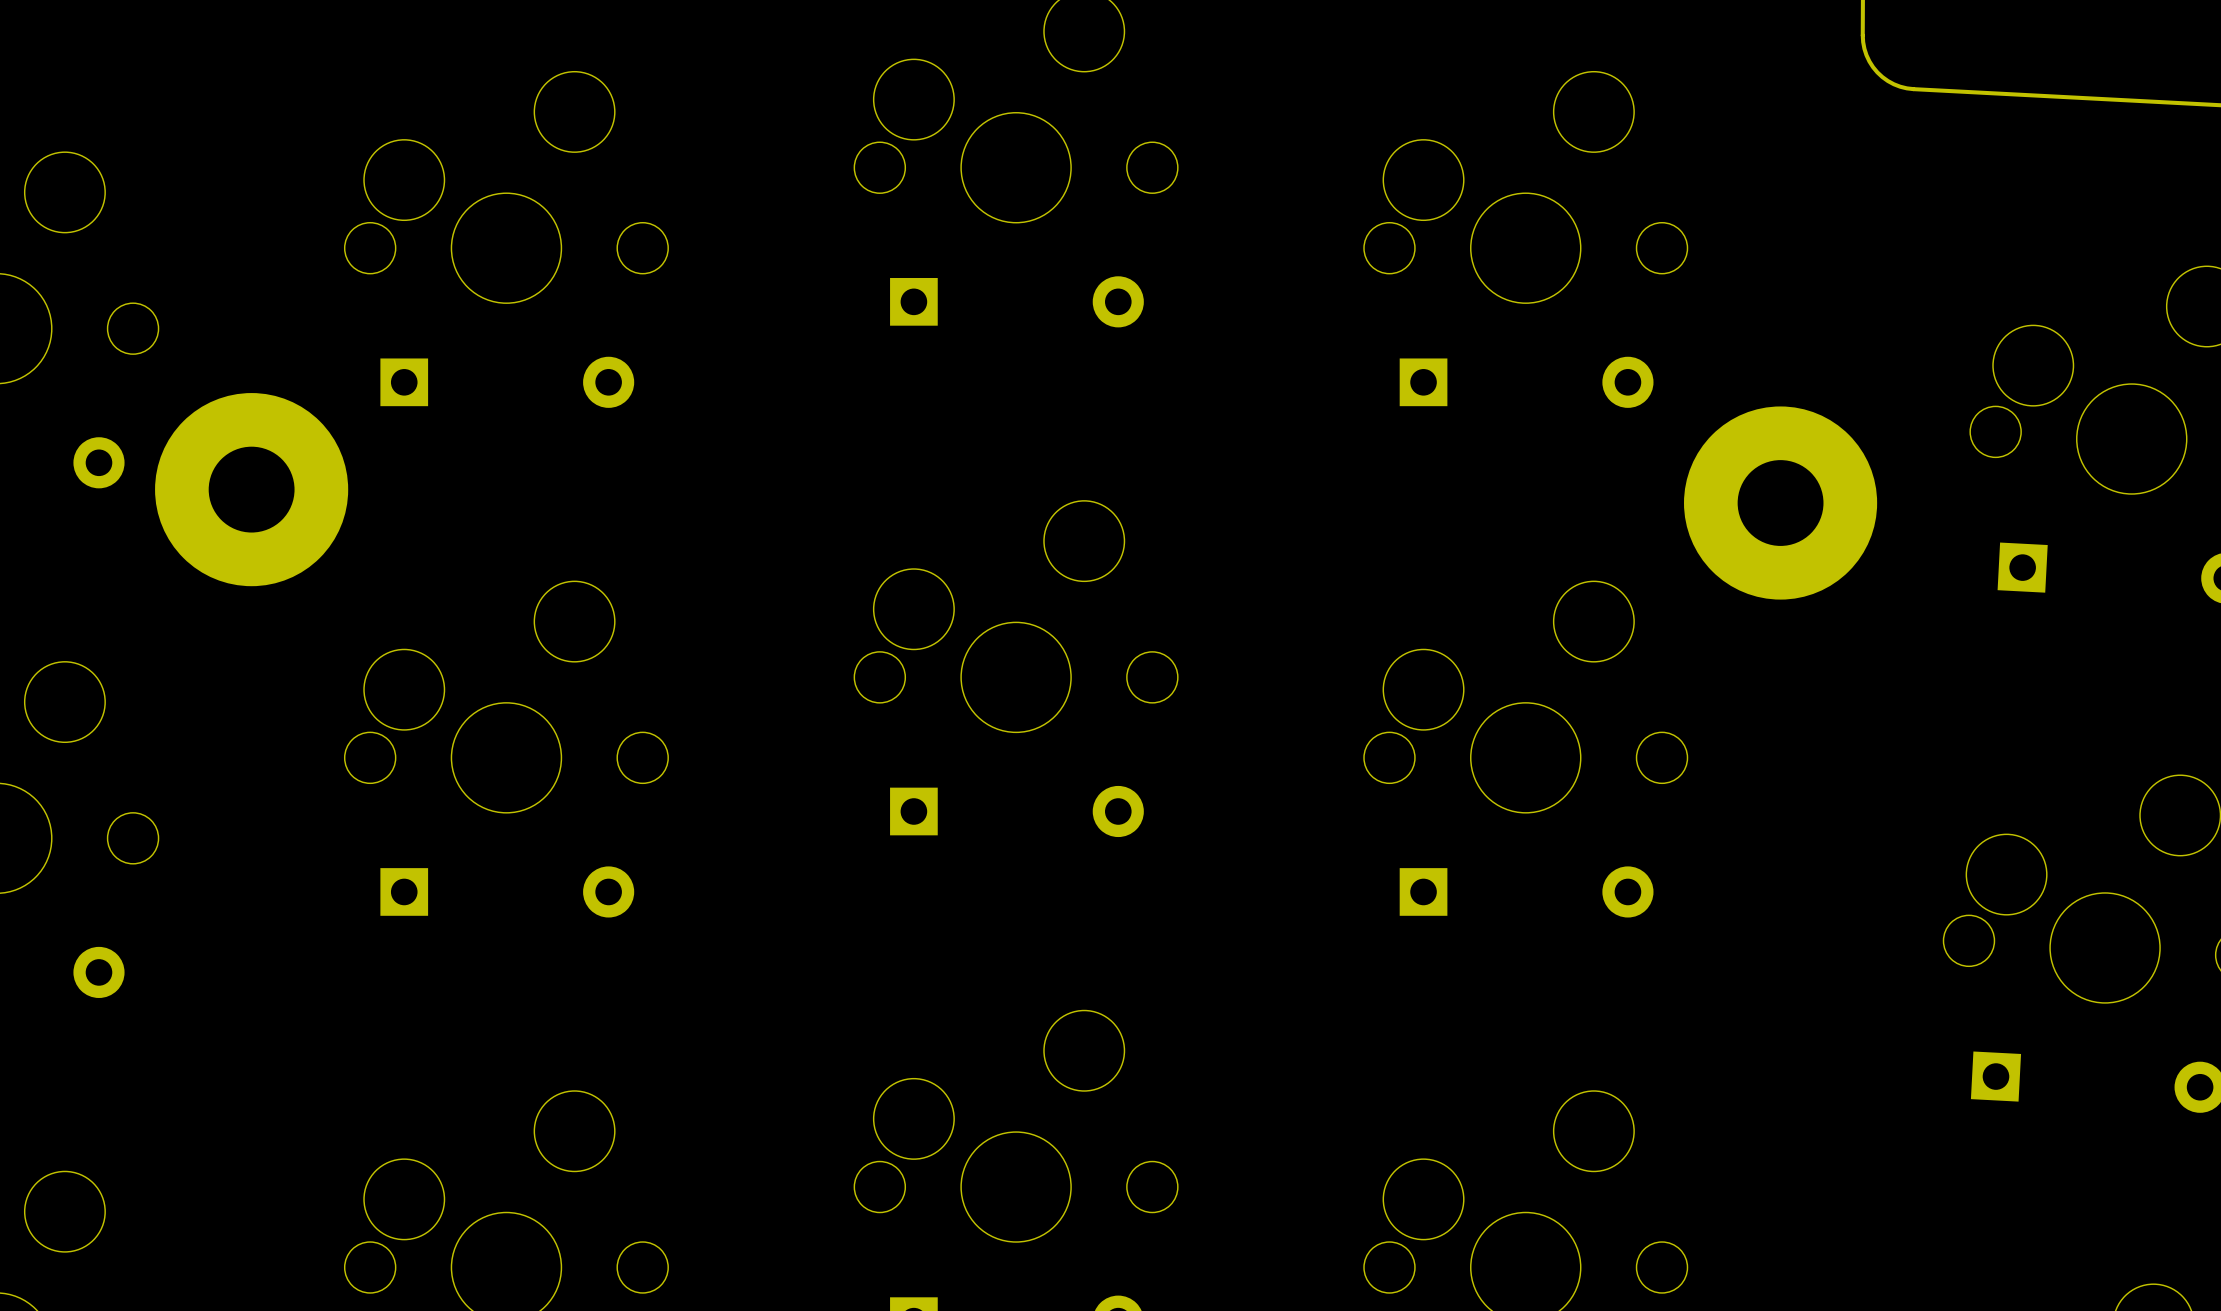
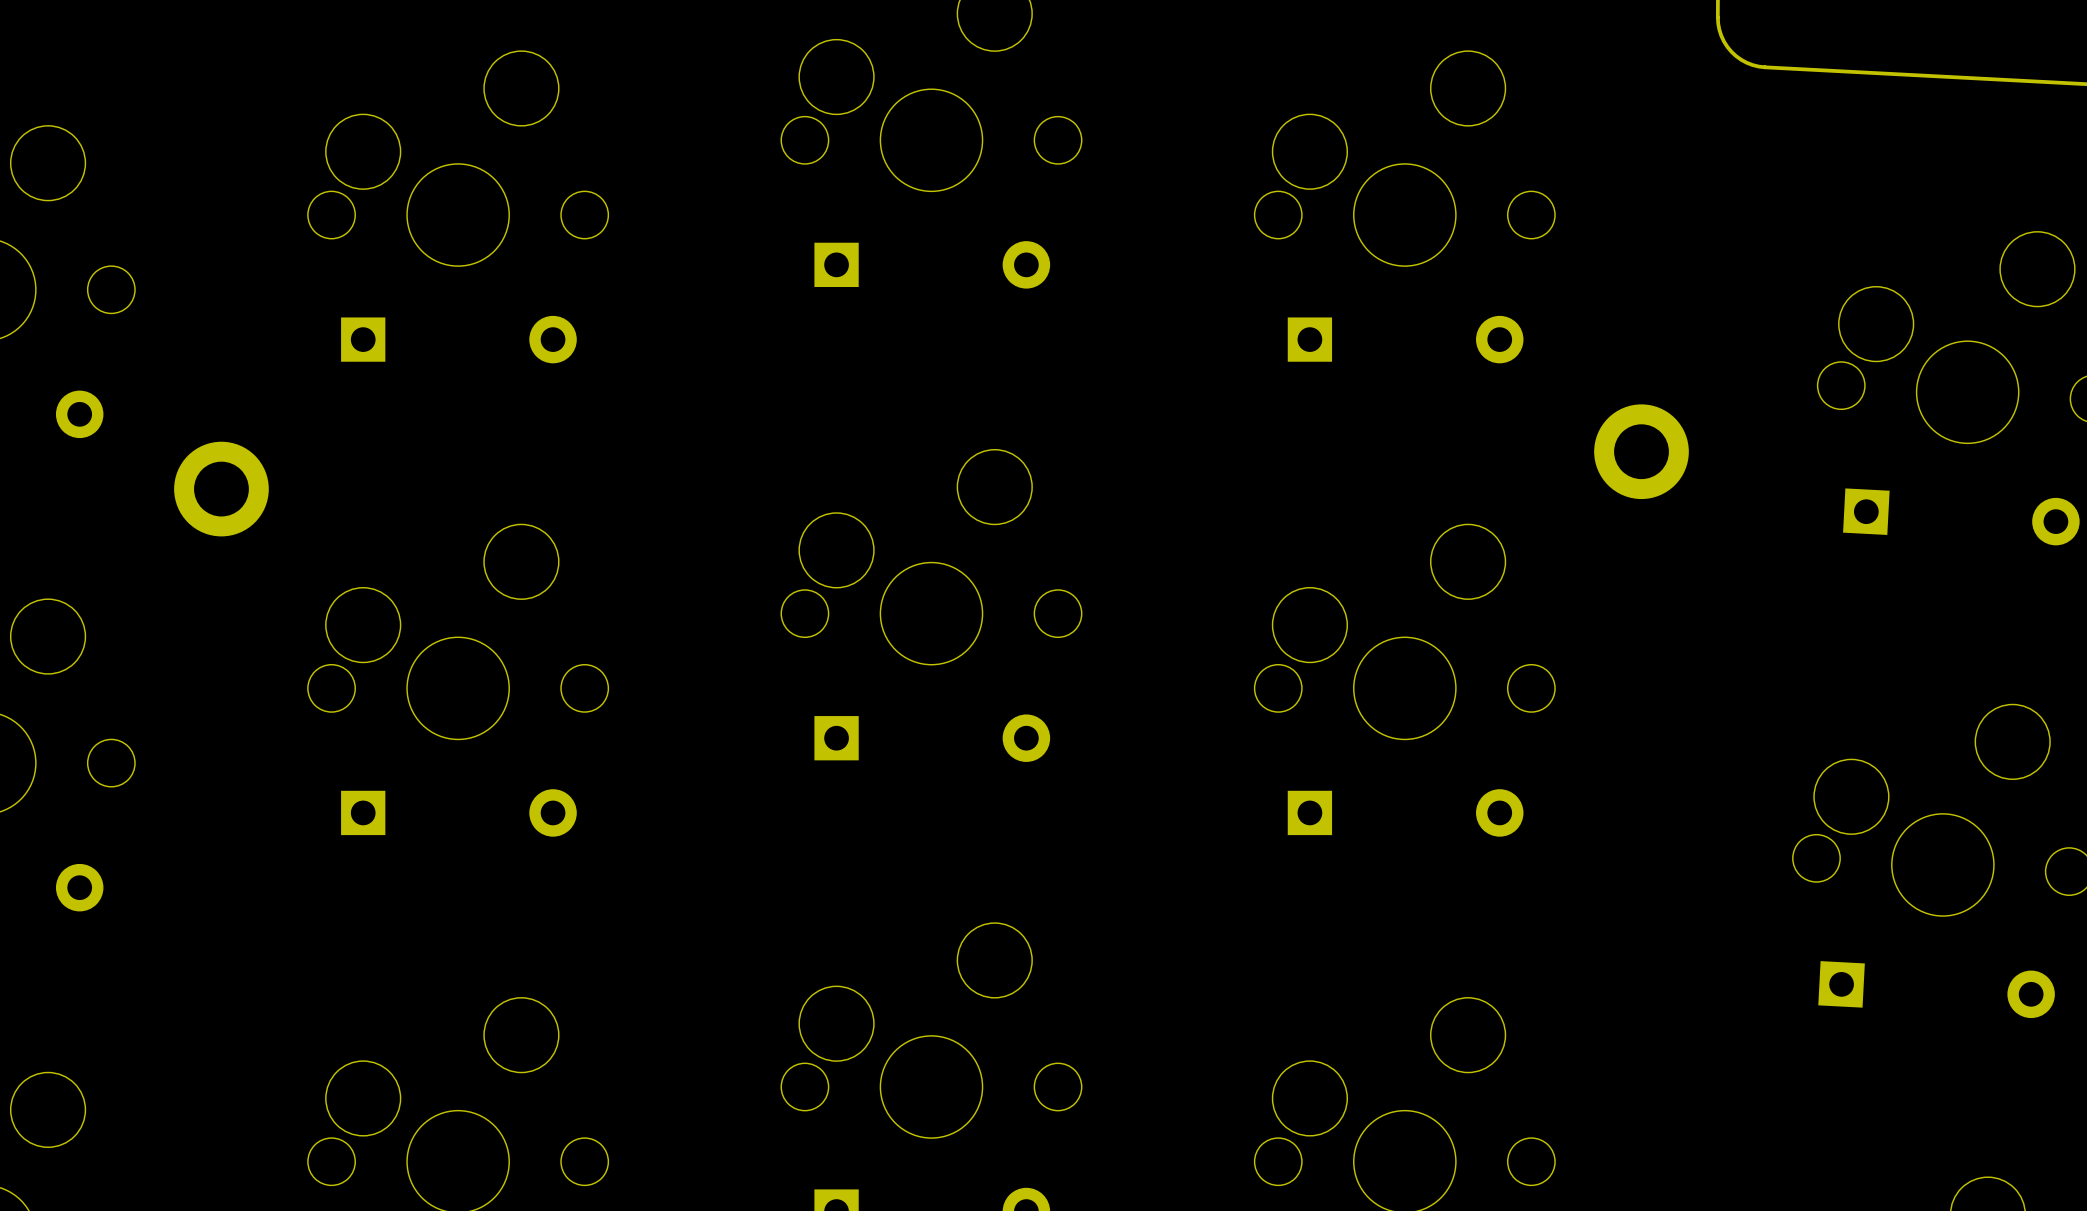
part footprint: [1684, 406, 1878, 600] -> [1594, 404, 1689, 500]
part: (251, 489) -> none
part: none -> (221, 489)

